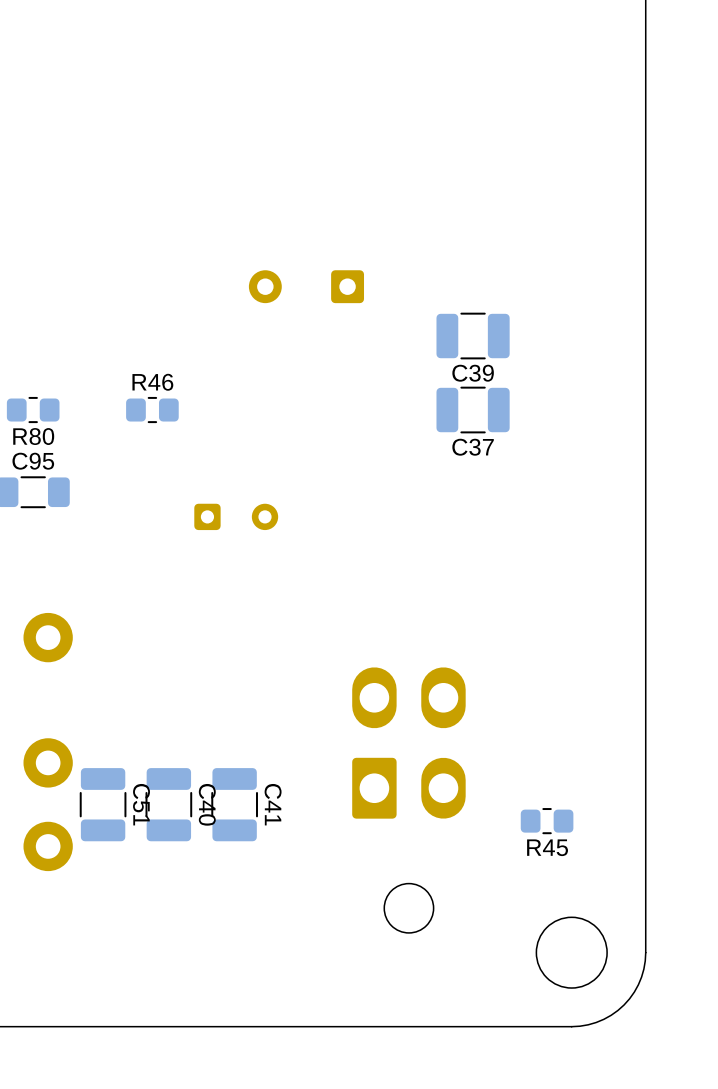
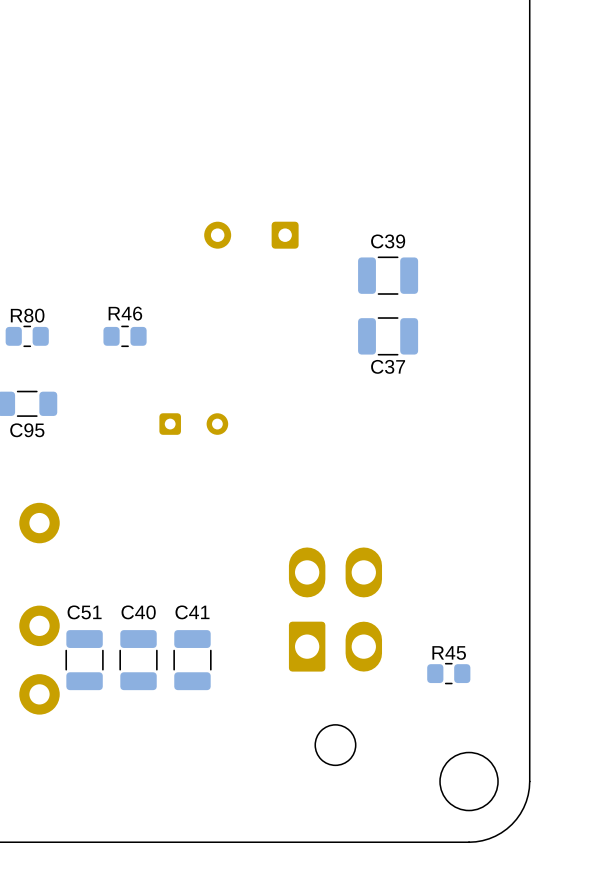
C39 name position: C39 (473, 373) -> C39 (388, 241)
R80 name position: R80 (33, 436) -> R80 (27, 315)
C95 name position: C95 (33, 461) -> C95 (27, 430)
C51 name rotation: 0° (141, 804) -> 90° counterclockwise (84, 612)
C51 name position: C51 (141, 804) -> C51 (84, 612)
C40 name rotation: 0° (207, 804) -> 90° counterclockwise (138, 612)
C40 name position: C40 (207, 804) -> C40 (138, 612)
C41 name rotation: 0° (273, 804) -> 90° counterclockwise (192, 612)
C41 name position: C41 (273, 804) -> C41 (192, 612)
R45 name position: R45 (547, 847) -> R45 (449, 652)

